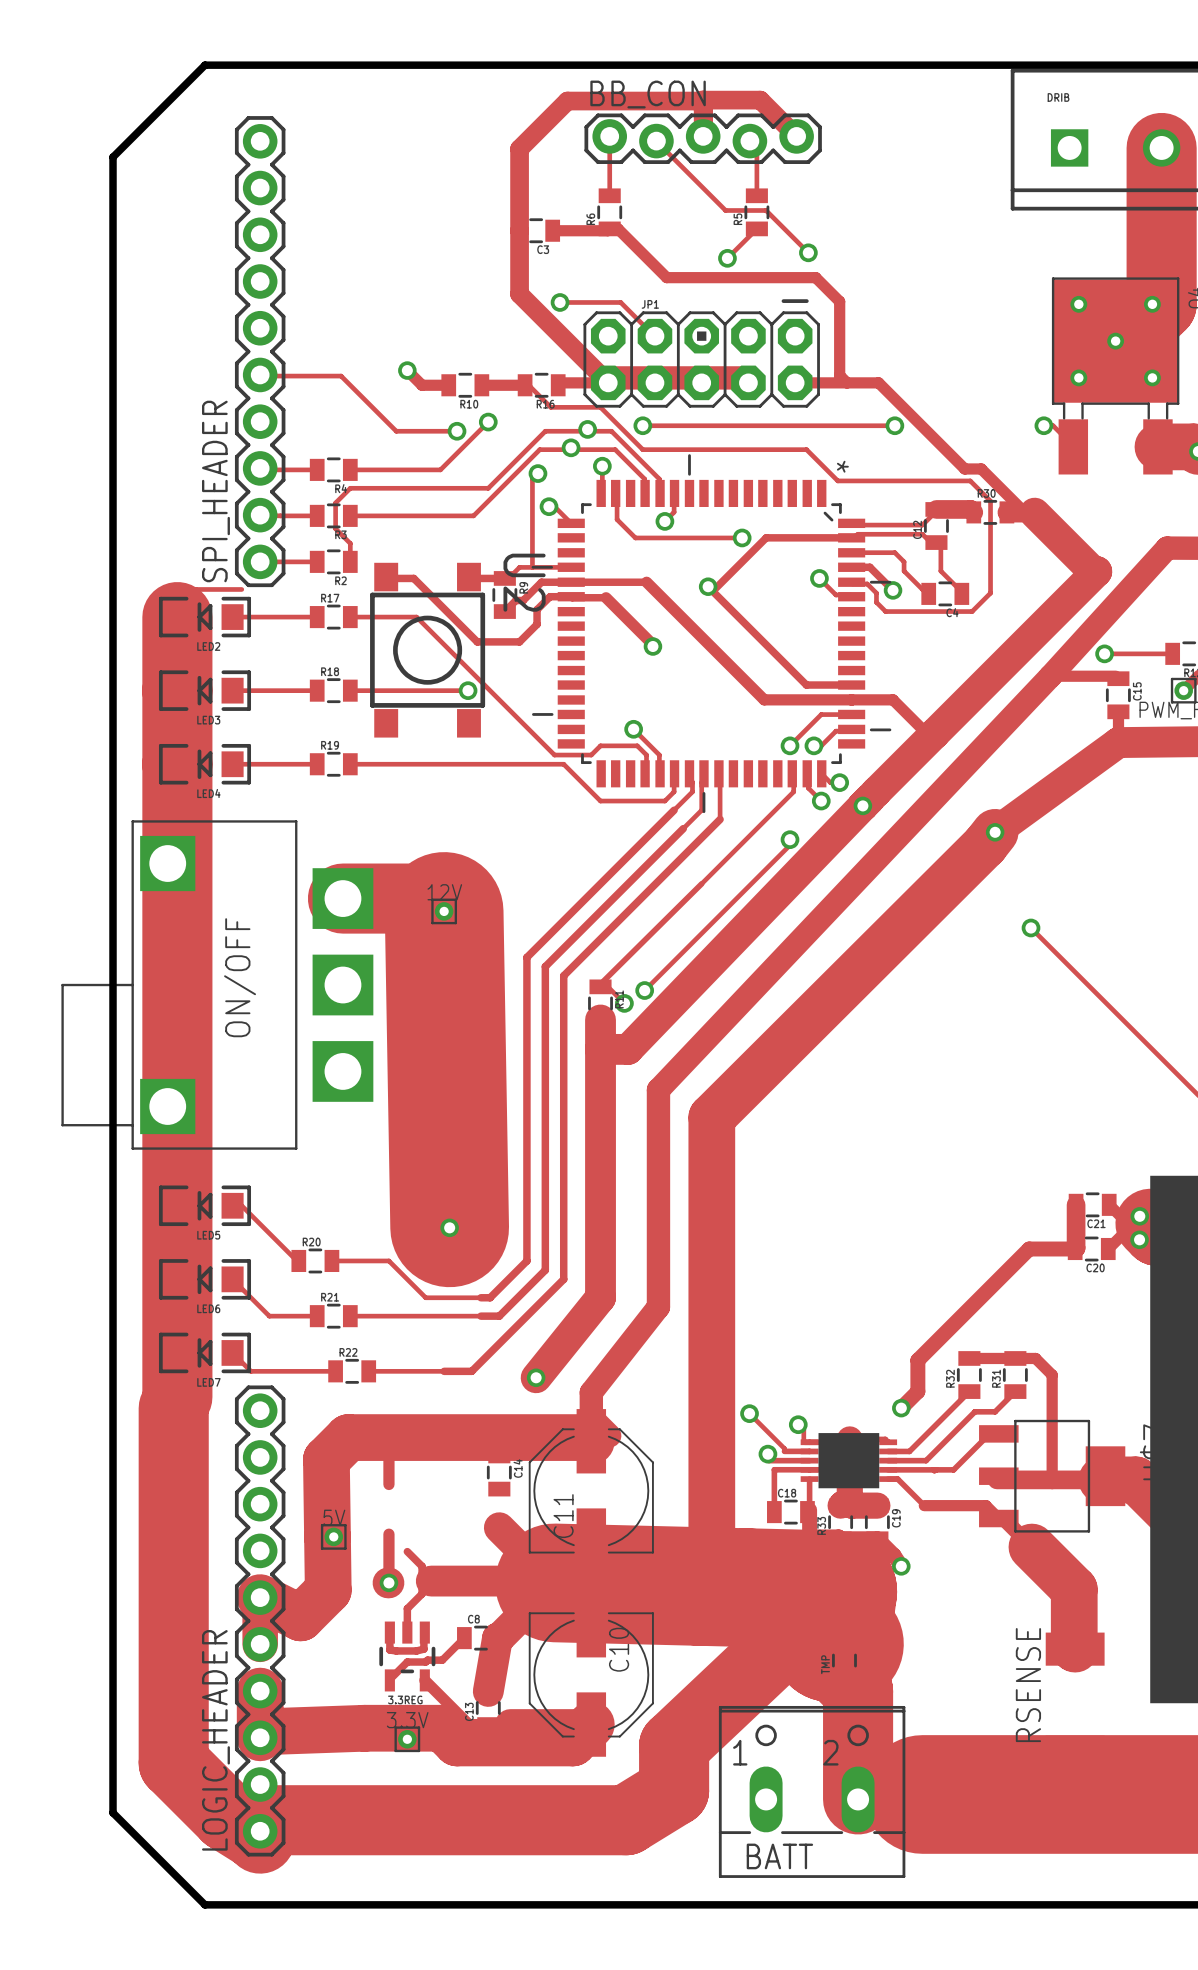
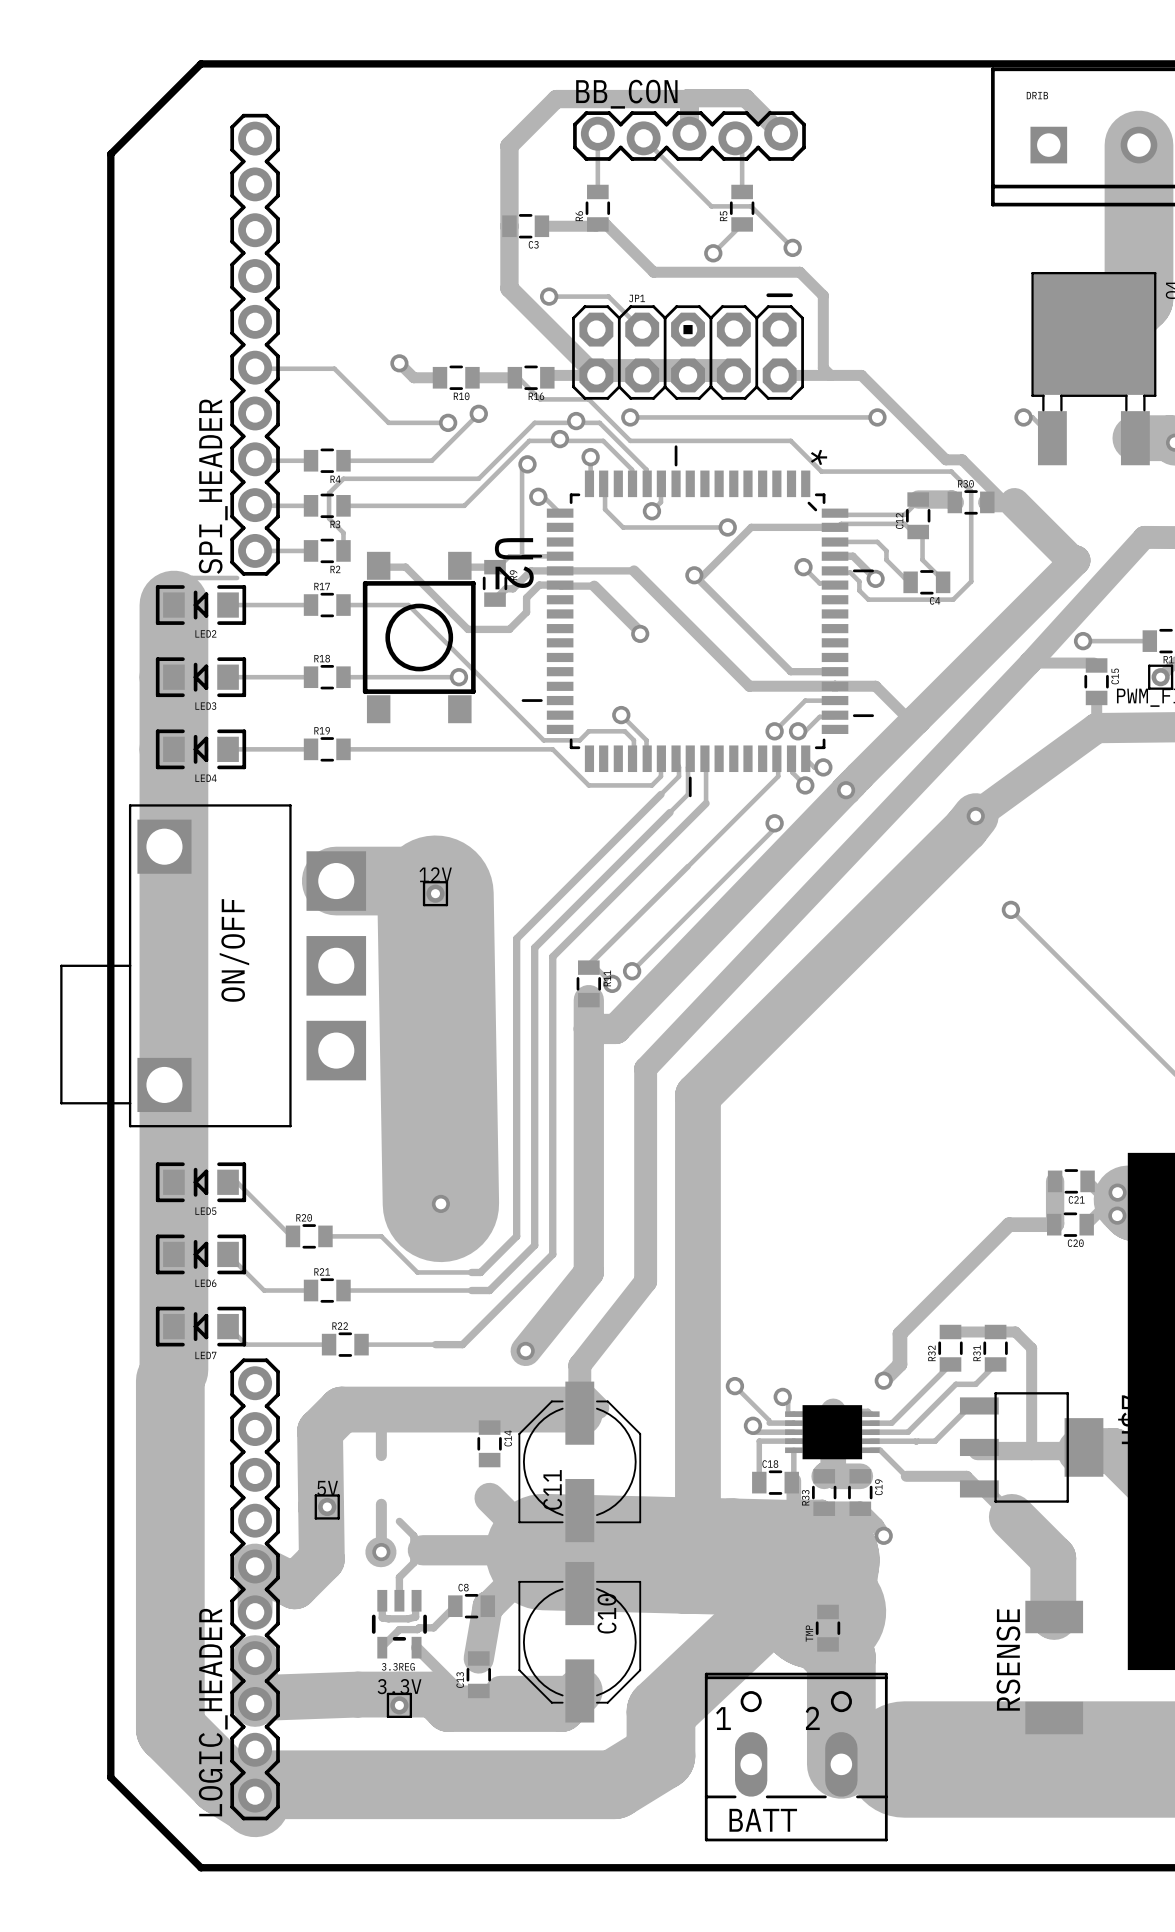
via: (1078, 304) -> none
via: (1152, 304) -> none
via: (1115, 341) -> none
via: (1078, 377) -> none
via: (1152, 377) -> none

